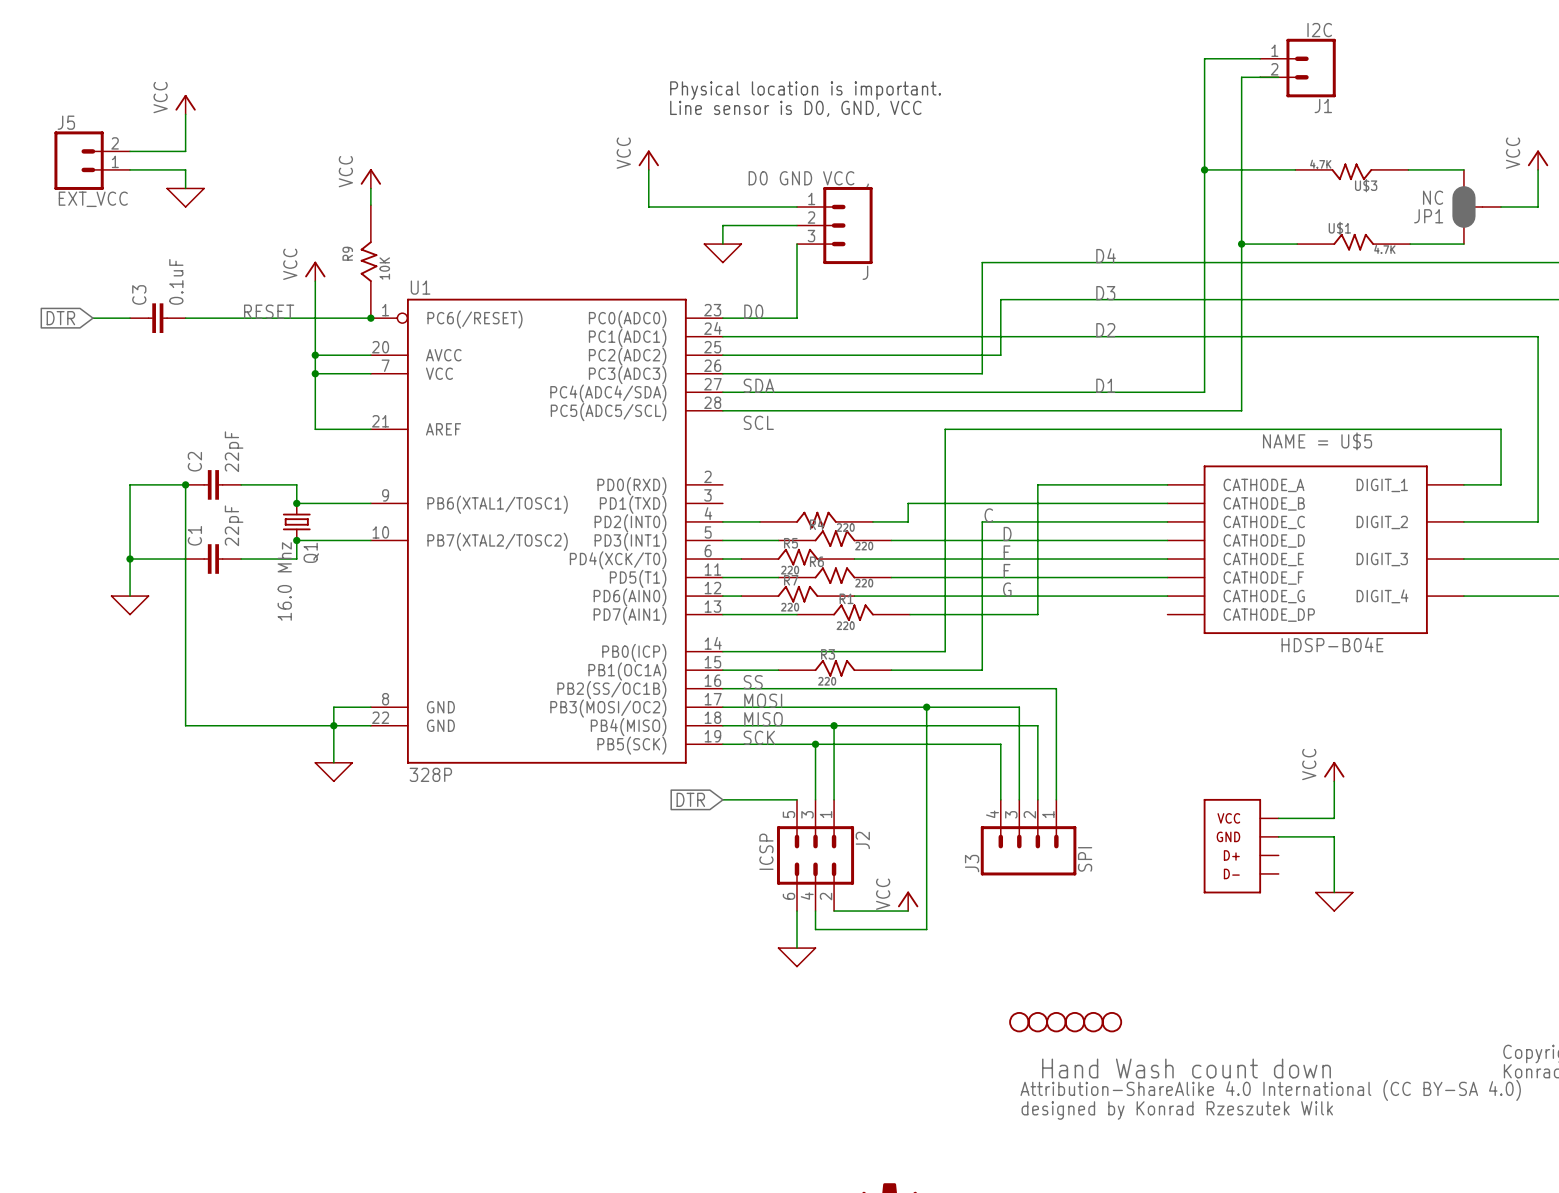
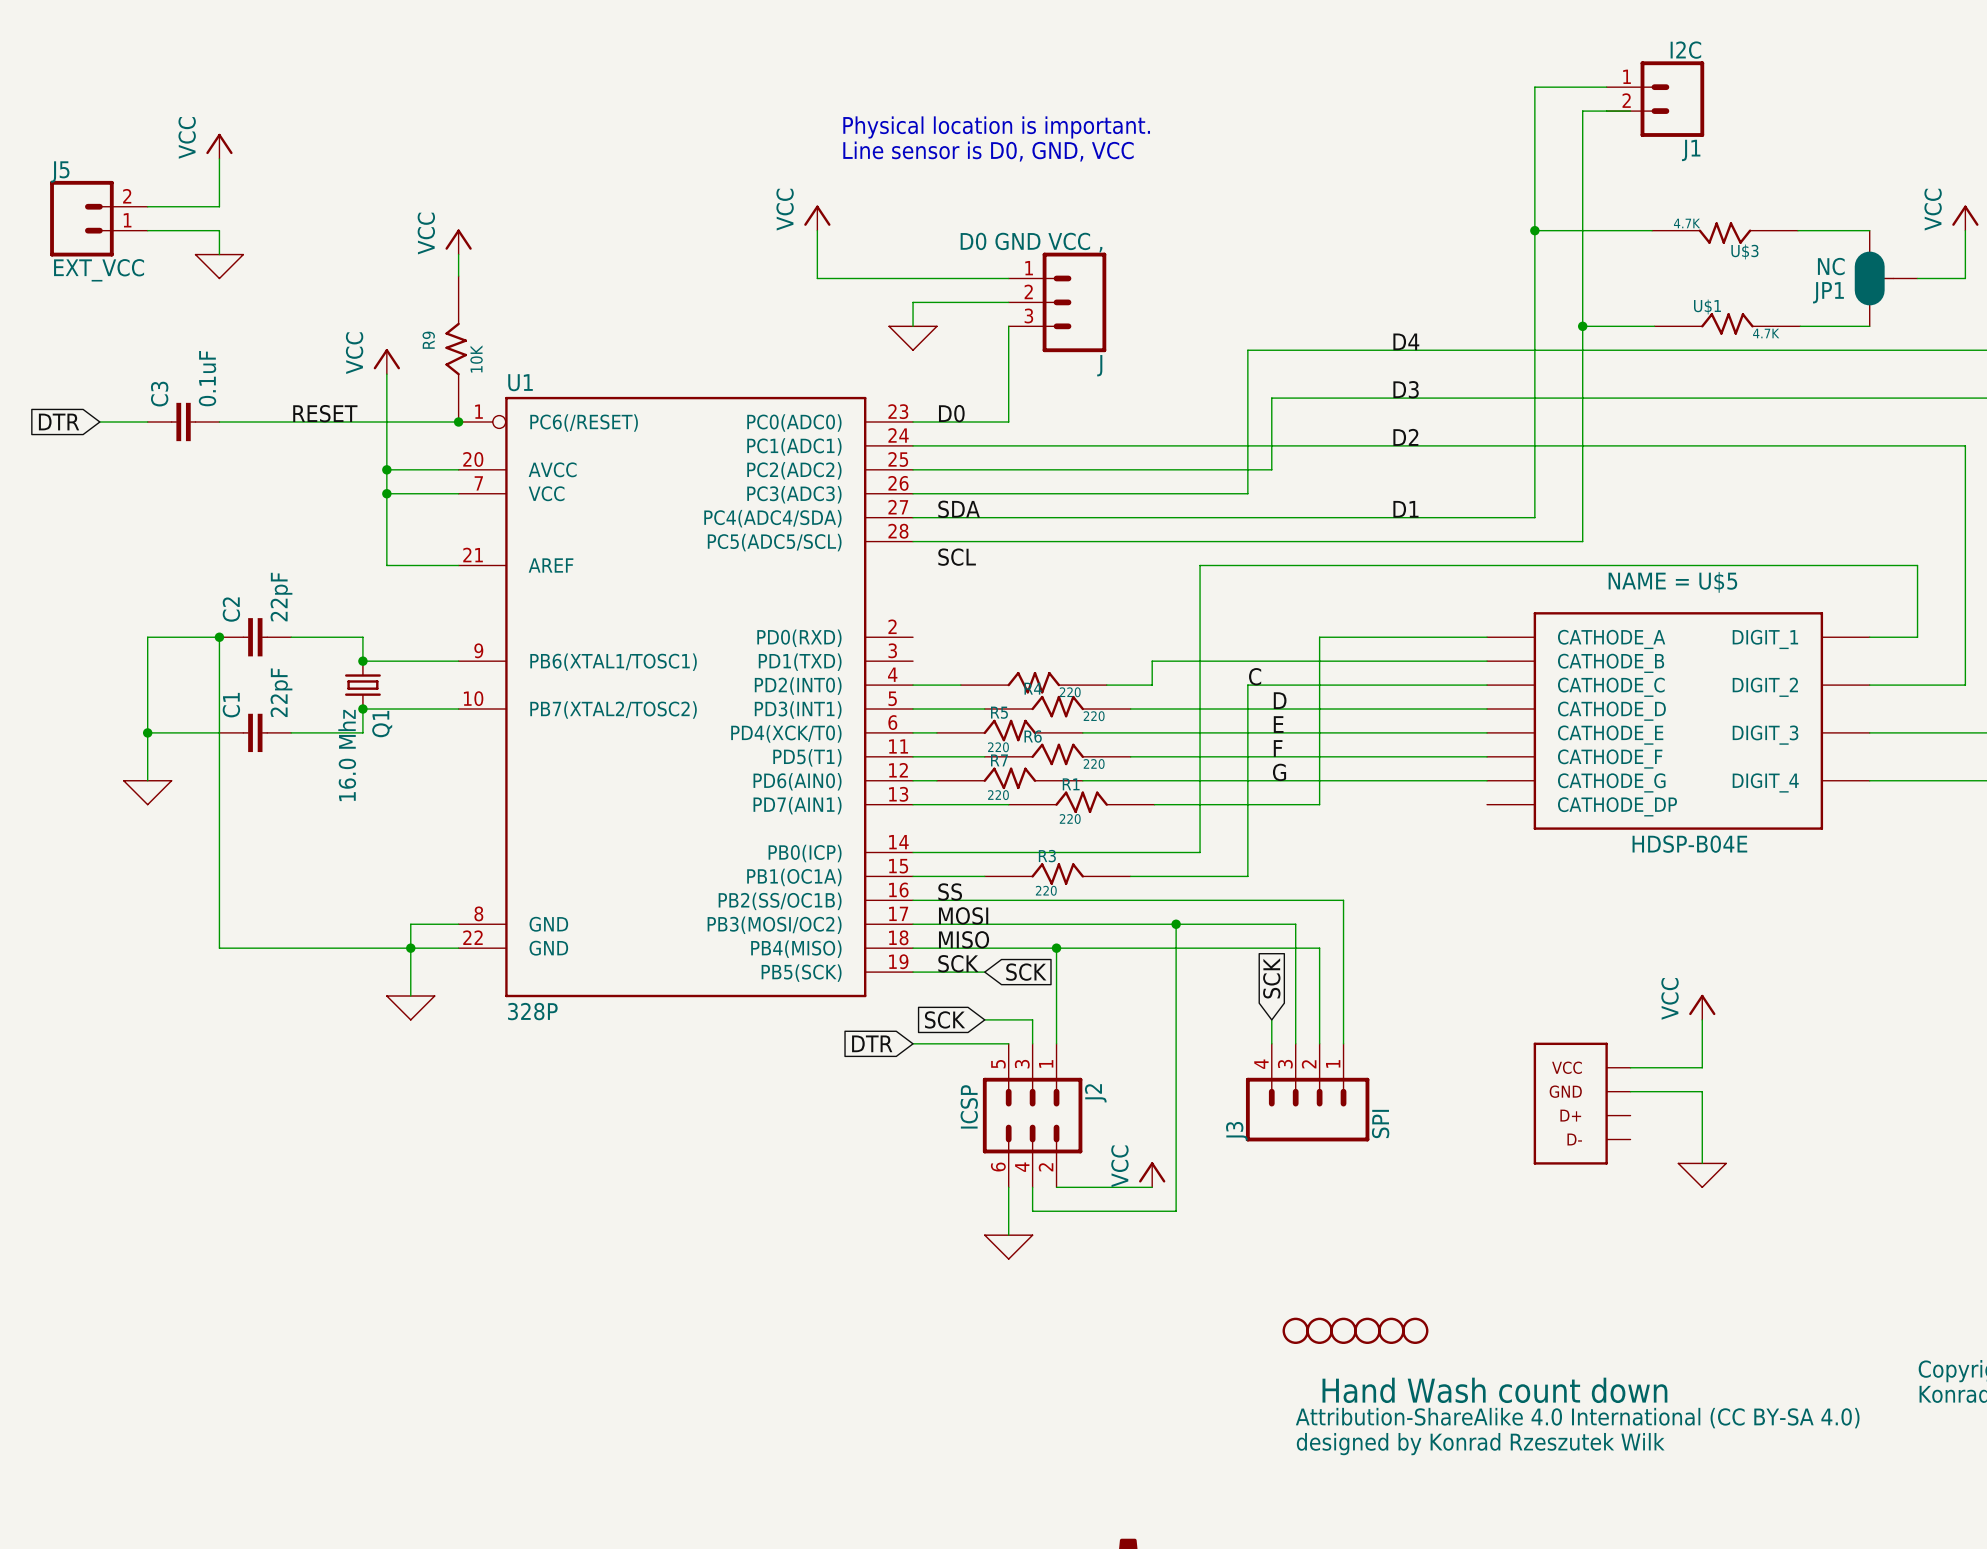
wire: (778, 744) (1000, 744) (1000, 781) -> none
global label: none -> SCK (1026, 972)
wire: (815, 744) (815, 781) -> (984, 1019) (1032, 1019)
junction: (815, 744) -> none
global label: none -> SCK (1271, 978)
global label: none -> SCK (945, 1019)

